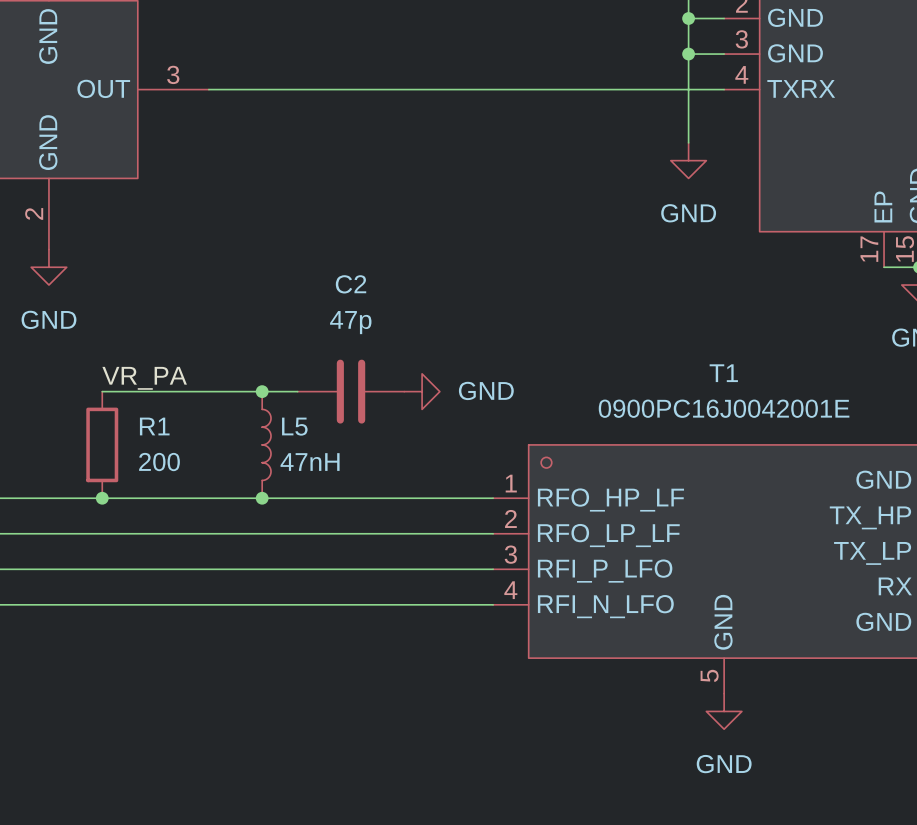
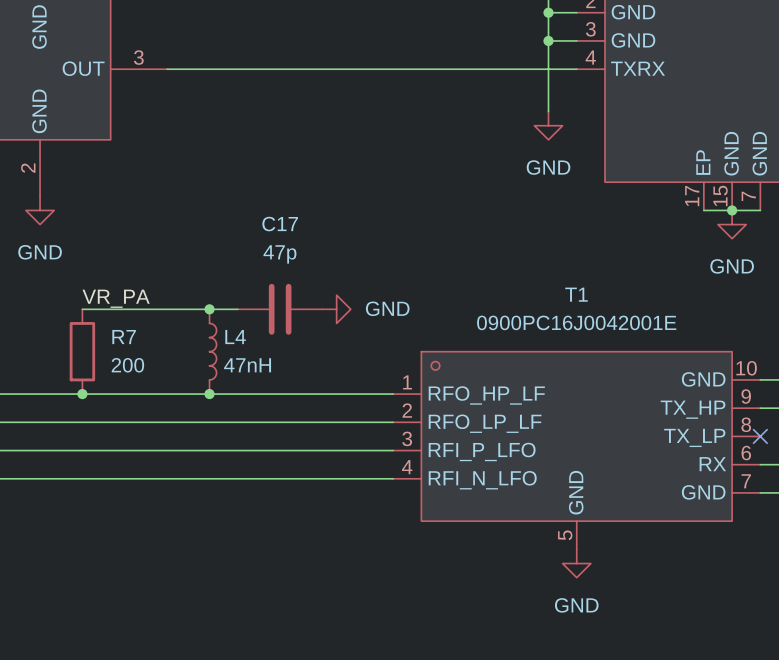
C2 name: C2 (351, 284) -> C17 (280, 224)
R1 name: R1 (154, 426) -> R7 (124, 337)
L5 name: L5 (294, 426) -> L4 (235, 337)

